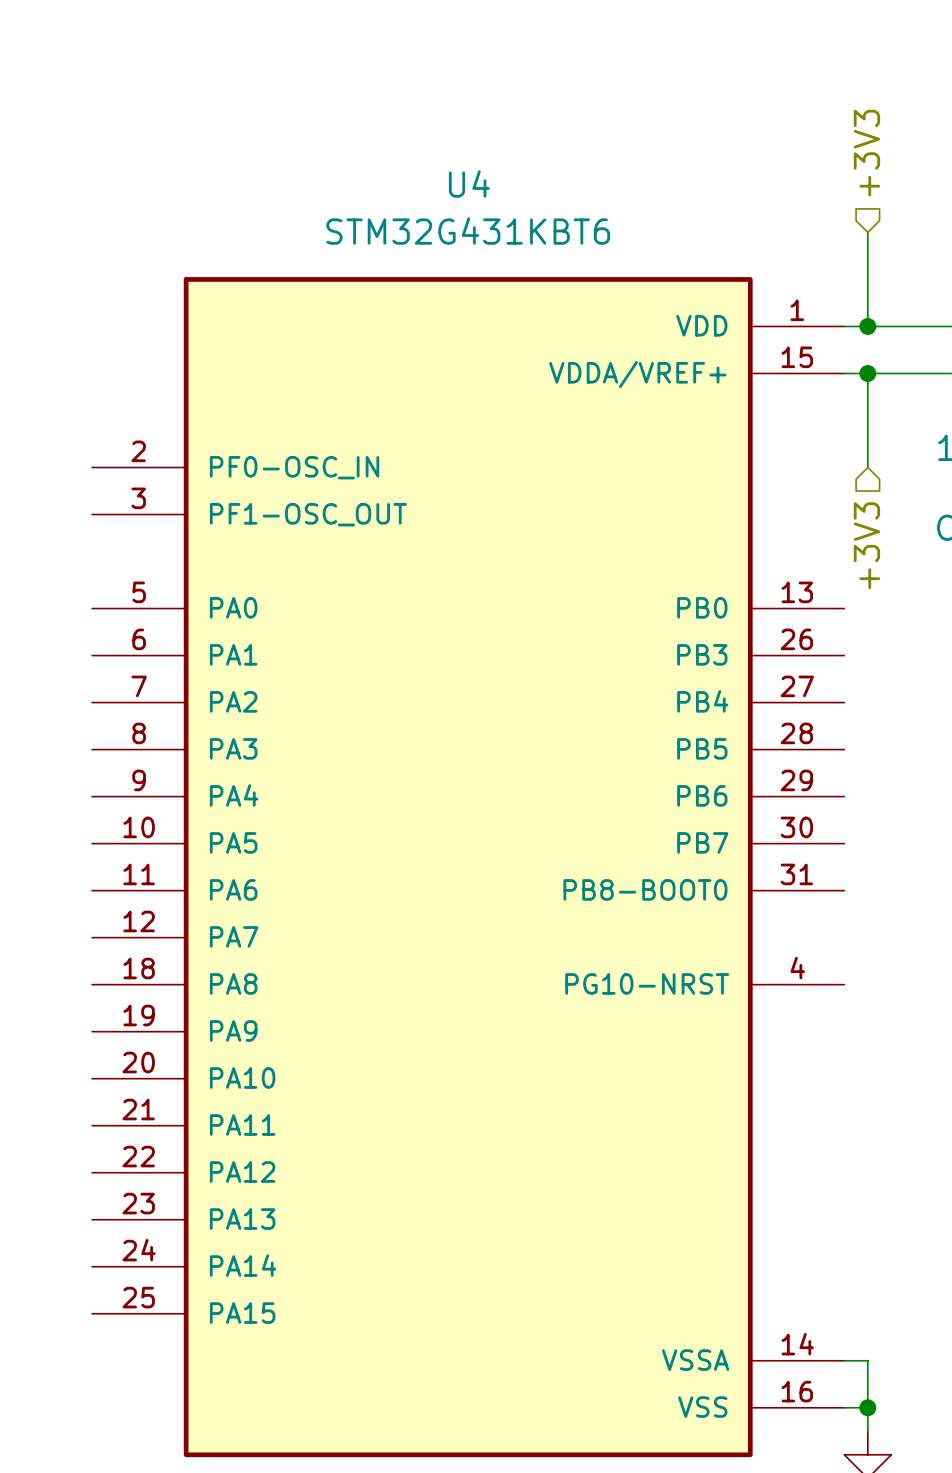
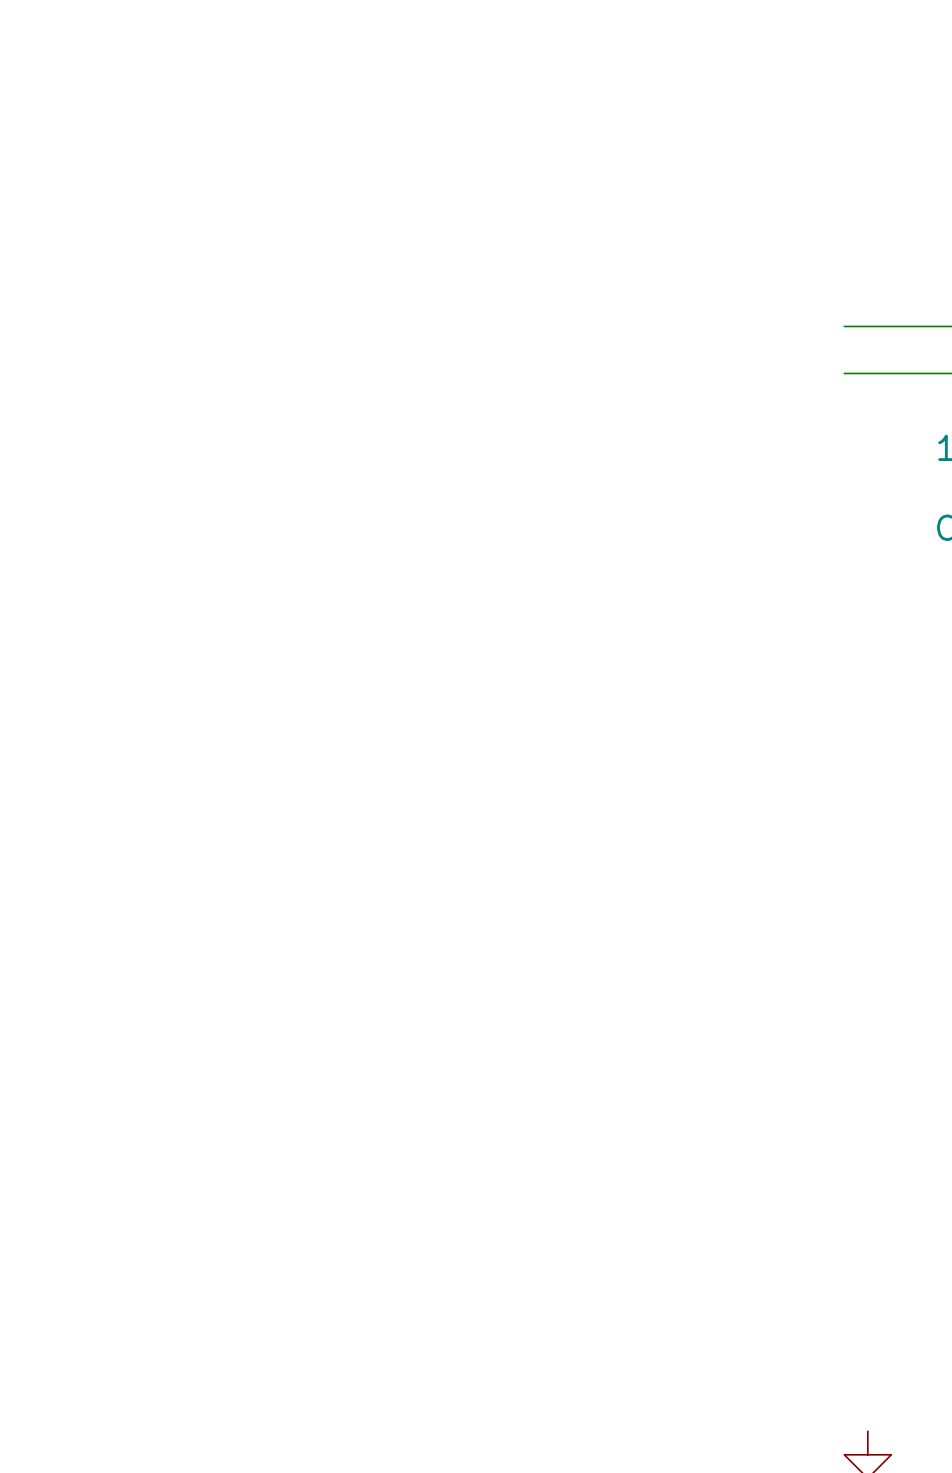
hierarchical label: +3V3 (866, 153) -> none
wire: (867, 232) (867, 326) -> none
junction: (867, 326) -> none
wire: (867, 373) (867, 467) -> none
junction: (867, 373) -> none
hierarchical label: +3V3 (866, 545) -> none
U4: STM32G431KBT6 (468, 867) -> none
wire: (844, 1360) (867, 1360) (867, 1431) -> none
wire: (844, 1407) (867, 1407) -> none
junction: (867, 1407) -> none

